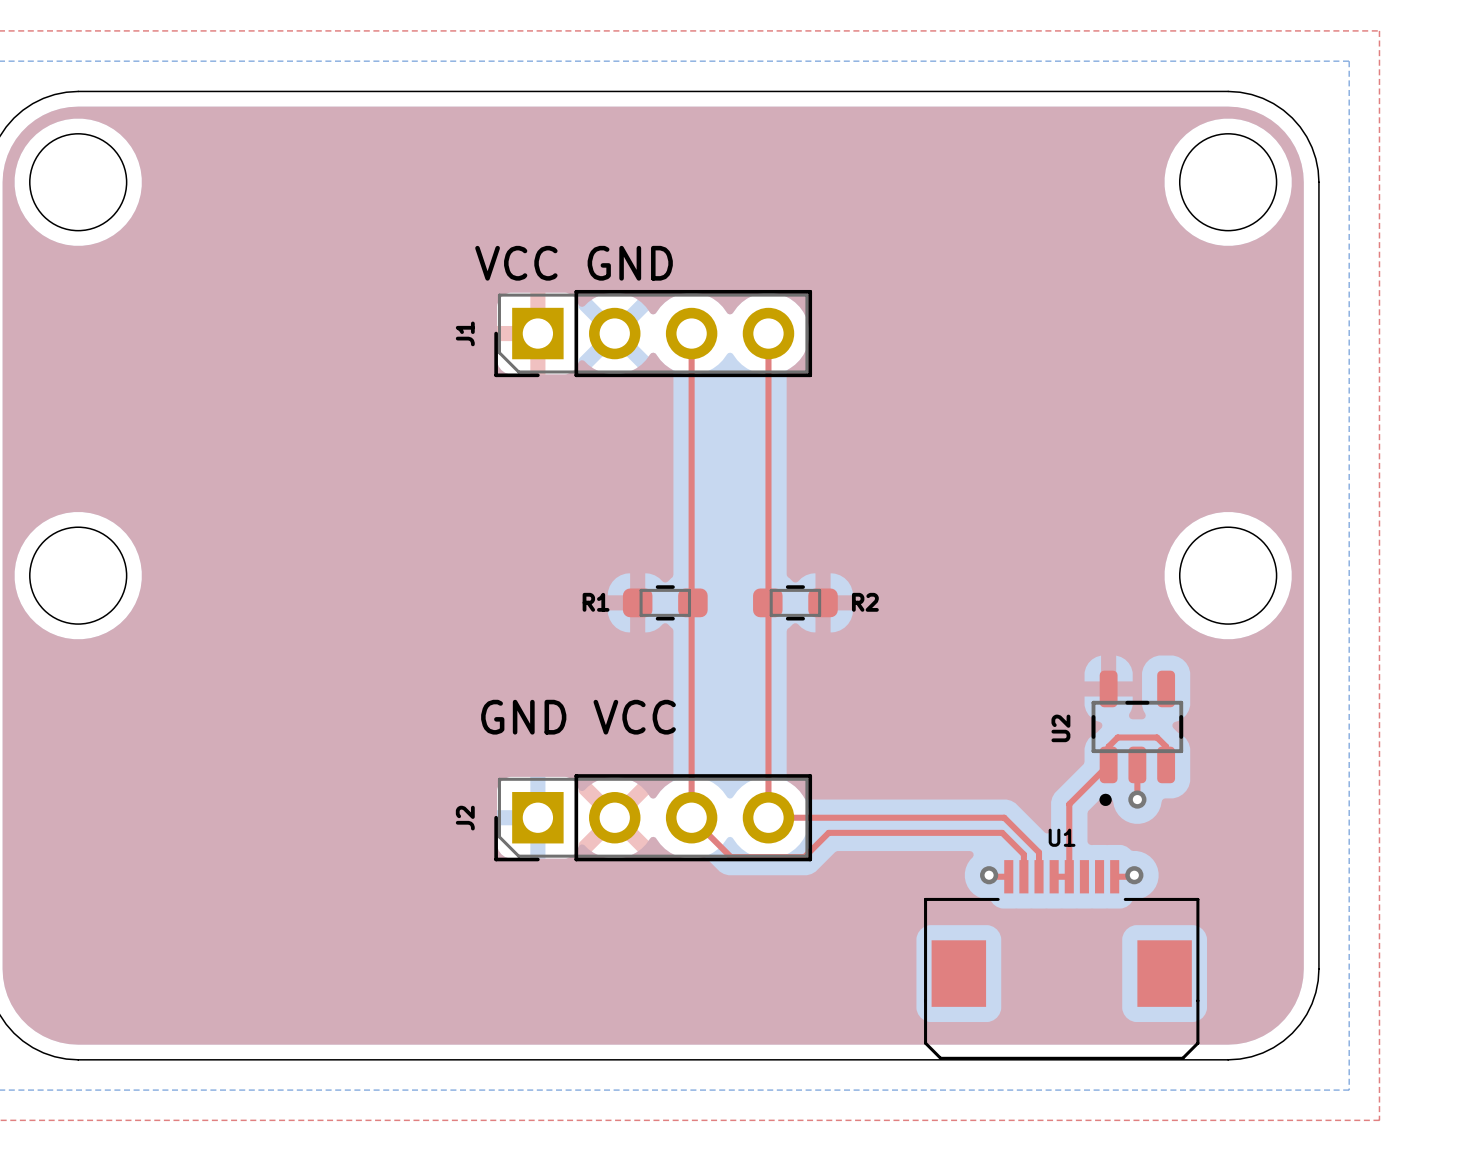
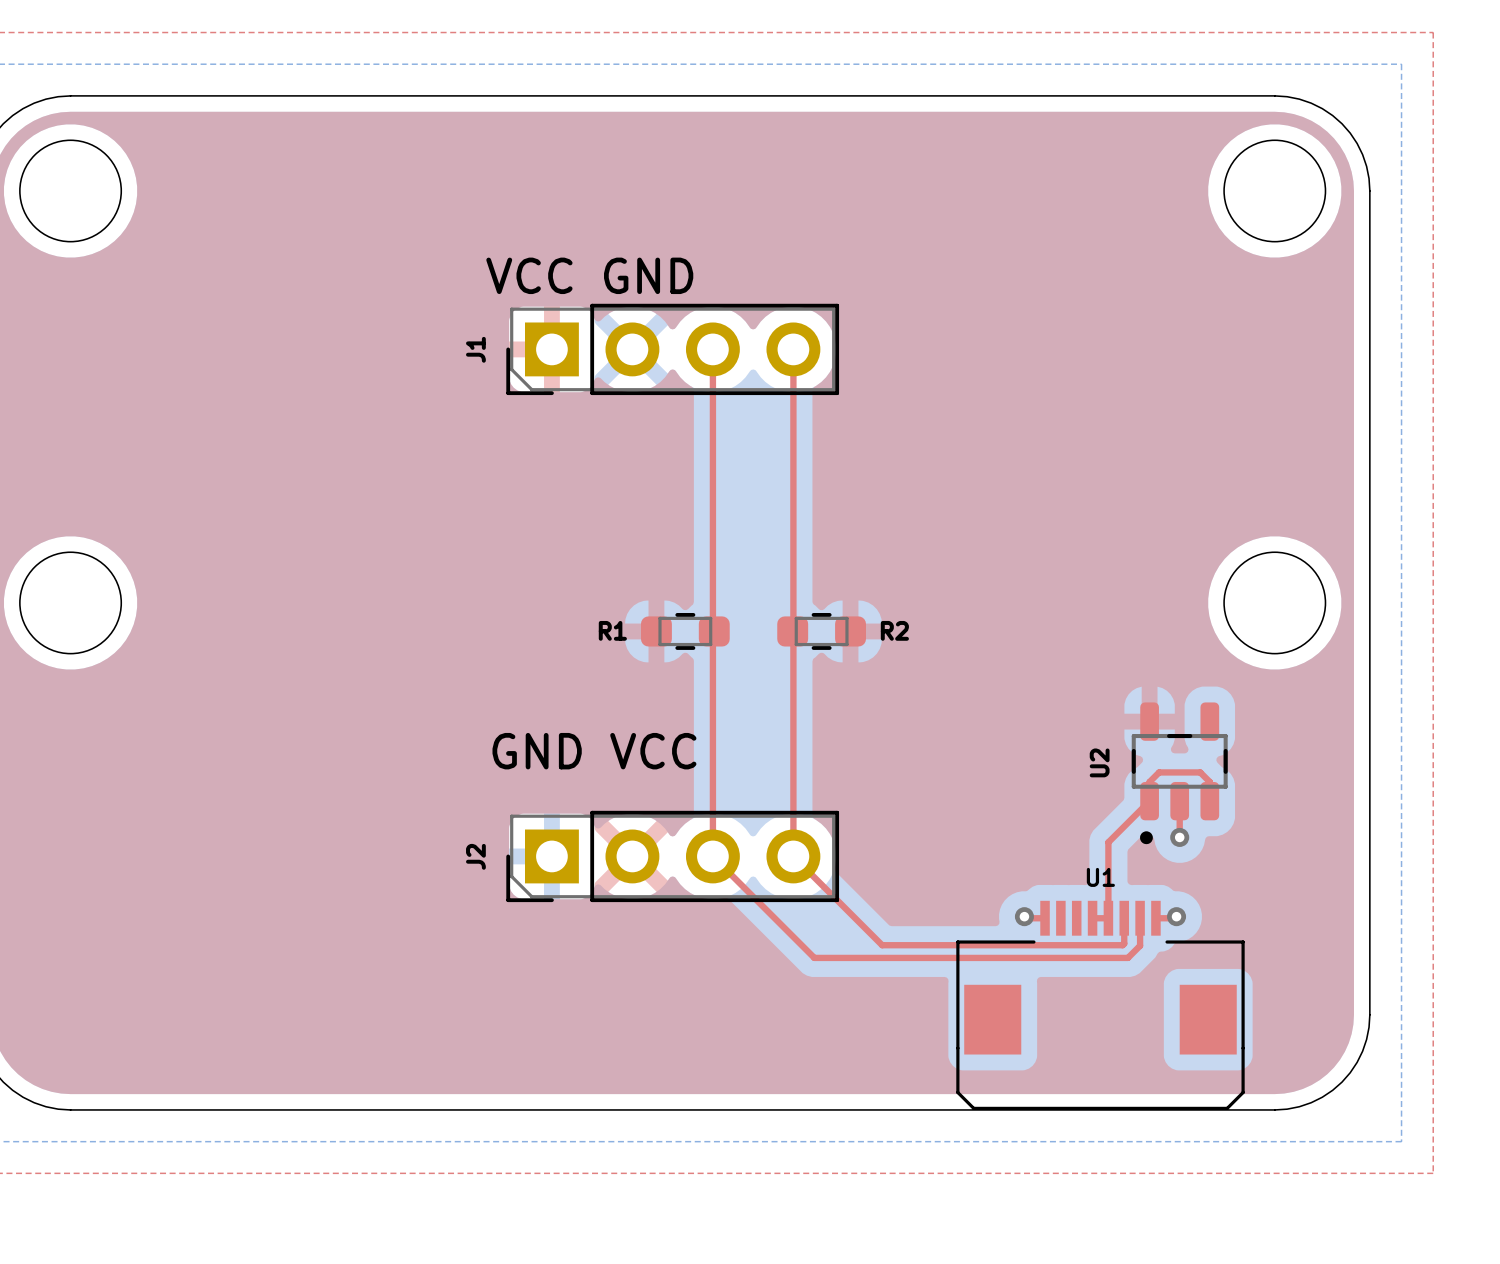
top track: (768, 817) (1004, 817) (1039, 852) (1039, 876) -> (793, 856) (882, 945) (1122, 945) (1124, 918)
top track: (730, 857) (804, 857) (828, 832) (1002, 832) (1023, 854) (1023, 876) -> (754, 897) (814, 957) (1127, 957) (1140, 945) (1140, 918)

